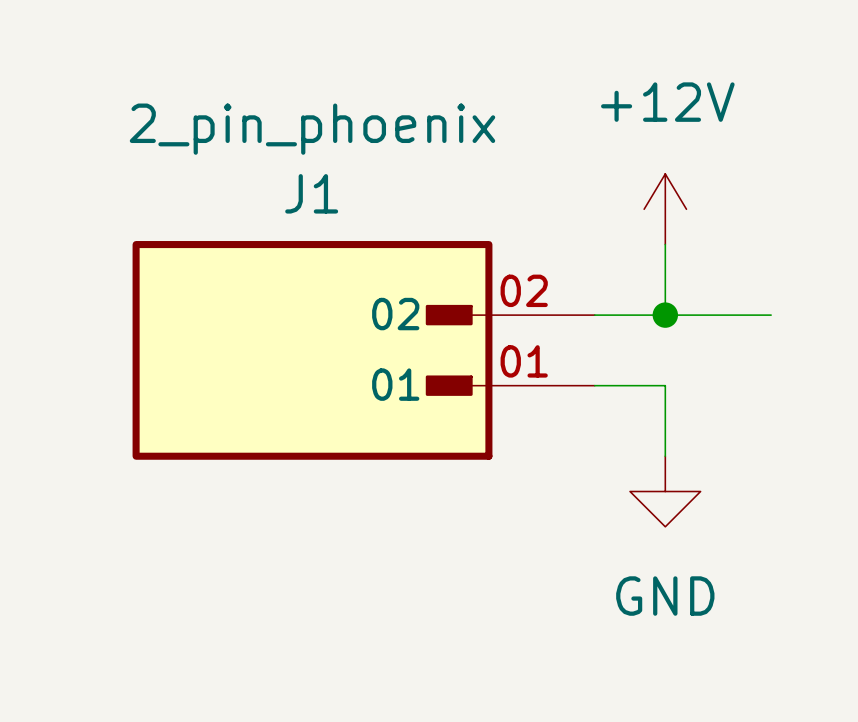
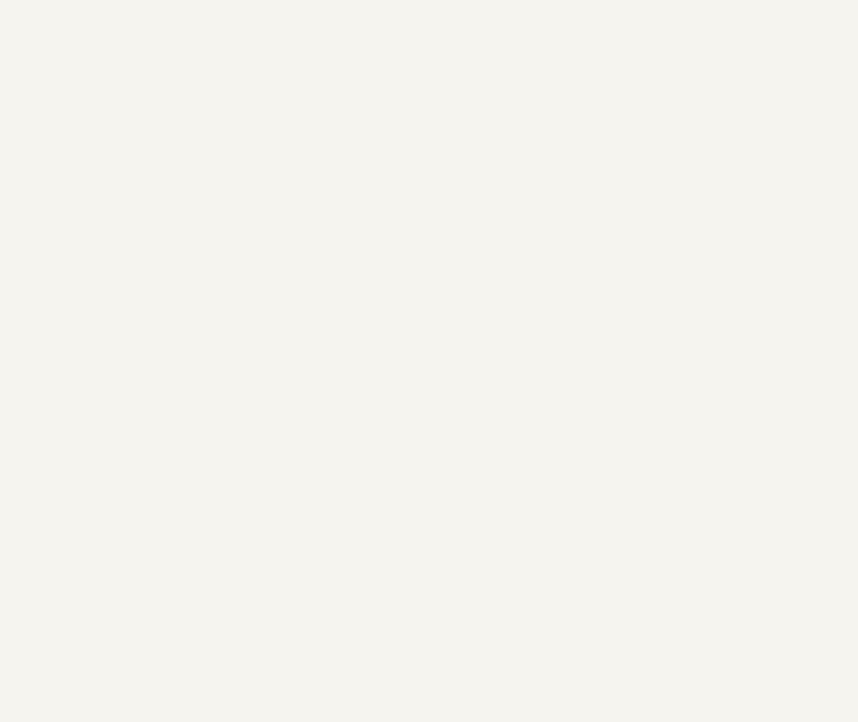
power symbol: +12V (665, 209) -> none
wire: (665, 244) (665, 315) -> none
wire: (594, 315) (771, 315) -> none
junction: (665, 315) -> none
J1: 2_pin_phoenix (363, 350) -> none
wire: (594, 385) (665, 385) (665, 456) -> none
power symbol: GND (665, 491) -> none

